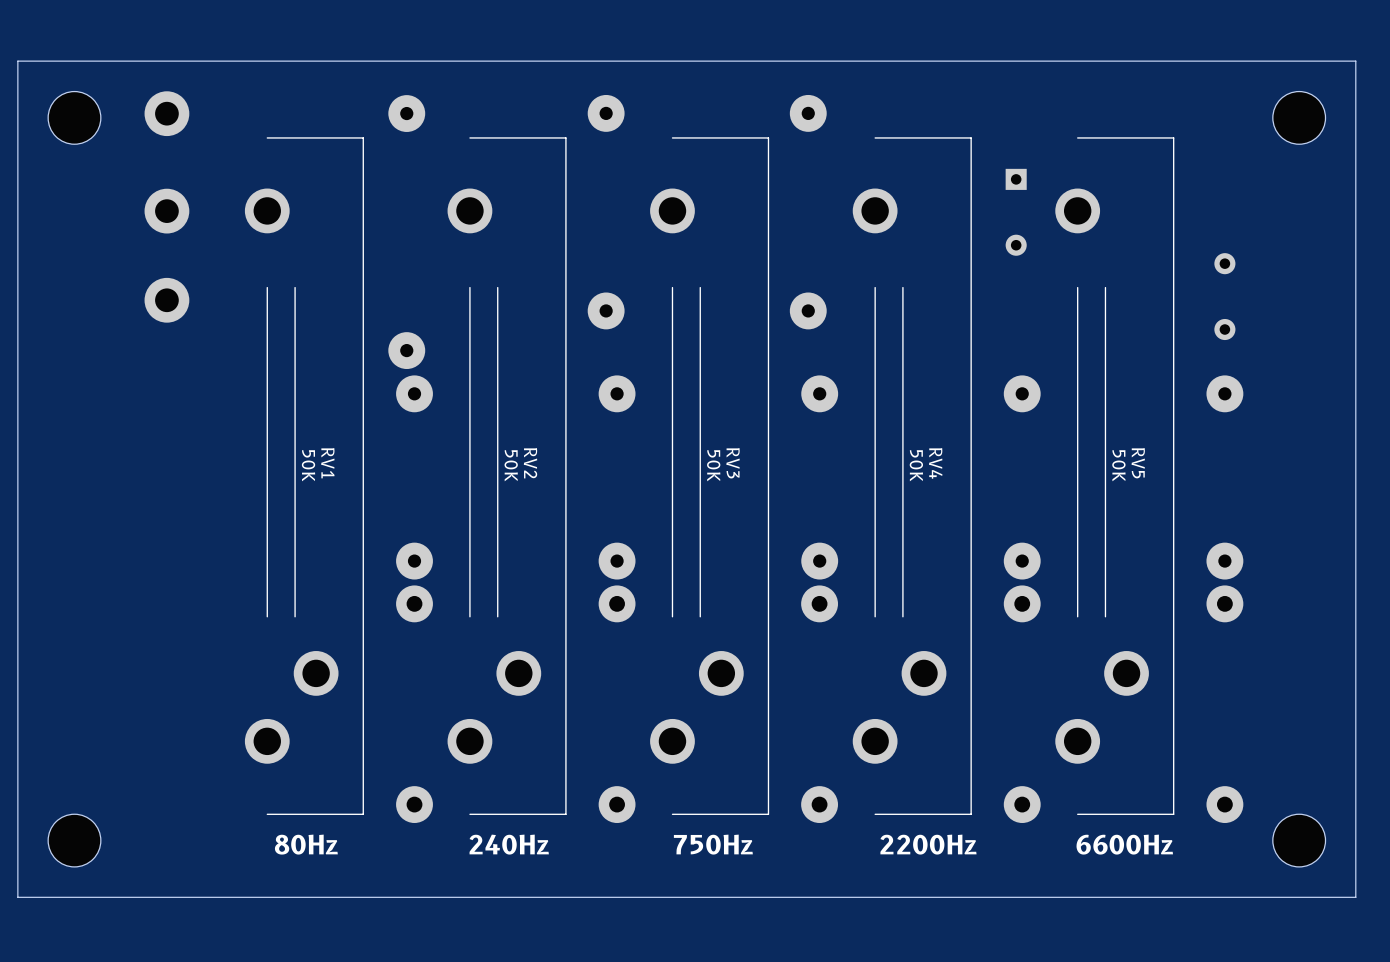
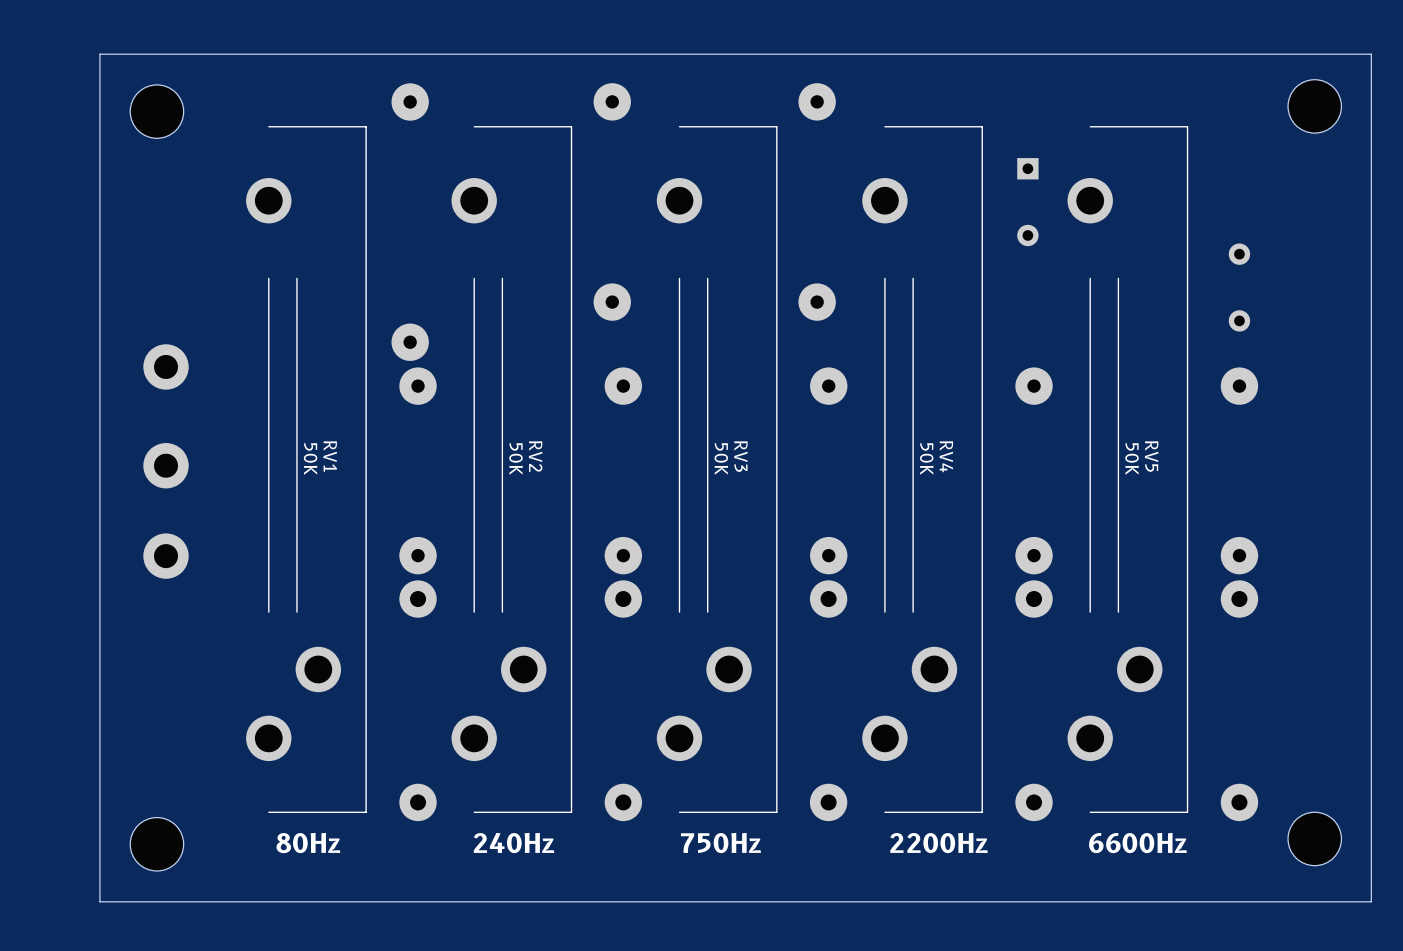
board edge: (1355, 61) (17, 61) (17, 897) (1355, 897) (1355, 61) -> (1371, 54) (1371, 901) (99, 901) (99, 54) (1371, 54)
part: (166, 113) -> none
part position: (74, 117) -> (156, 111)
part: (166, 211) -> none
part position: (166, 300) -> (166, 366)
part: none -> (166, 465)
part: none -> (166, 556)
part position: (74, 840) -> (156, 844)

